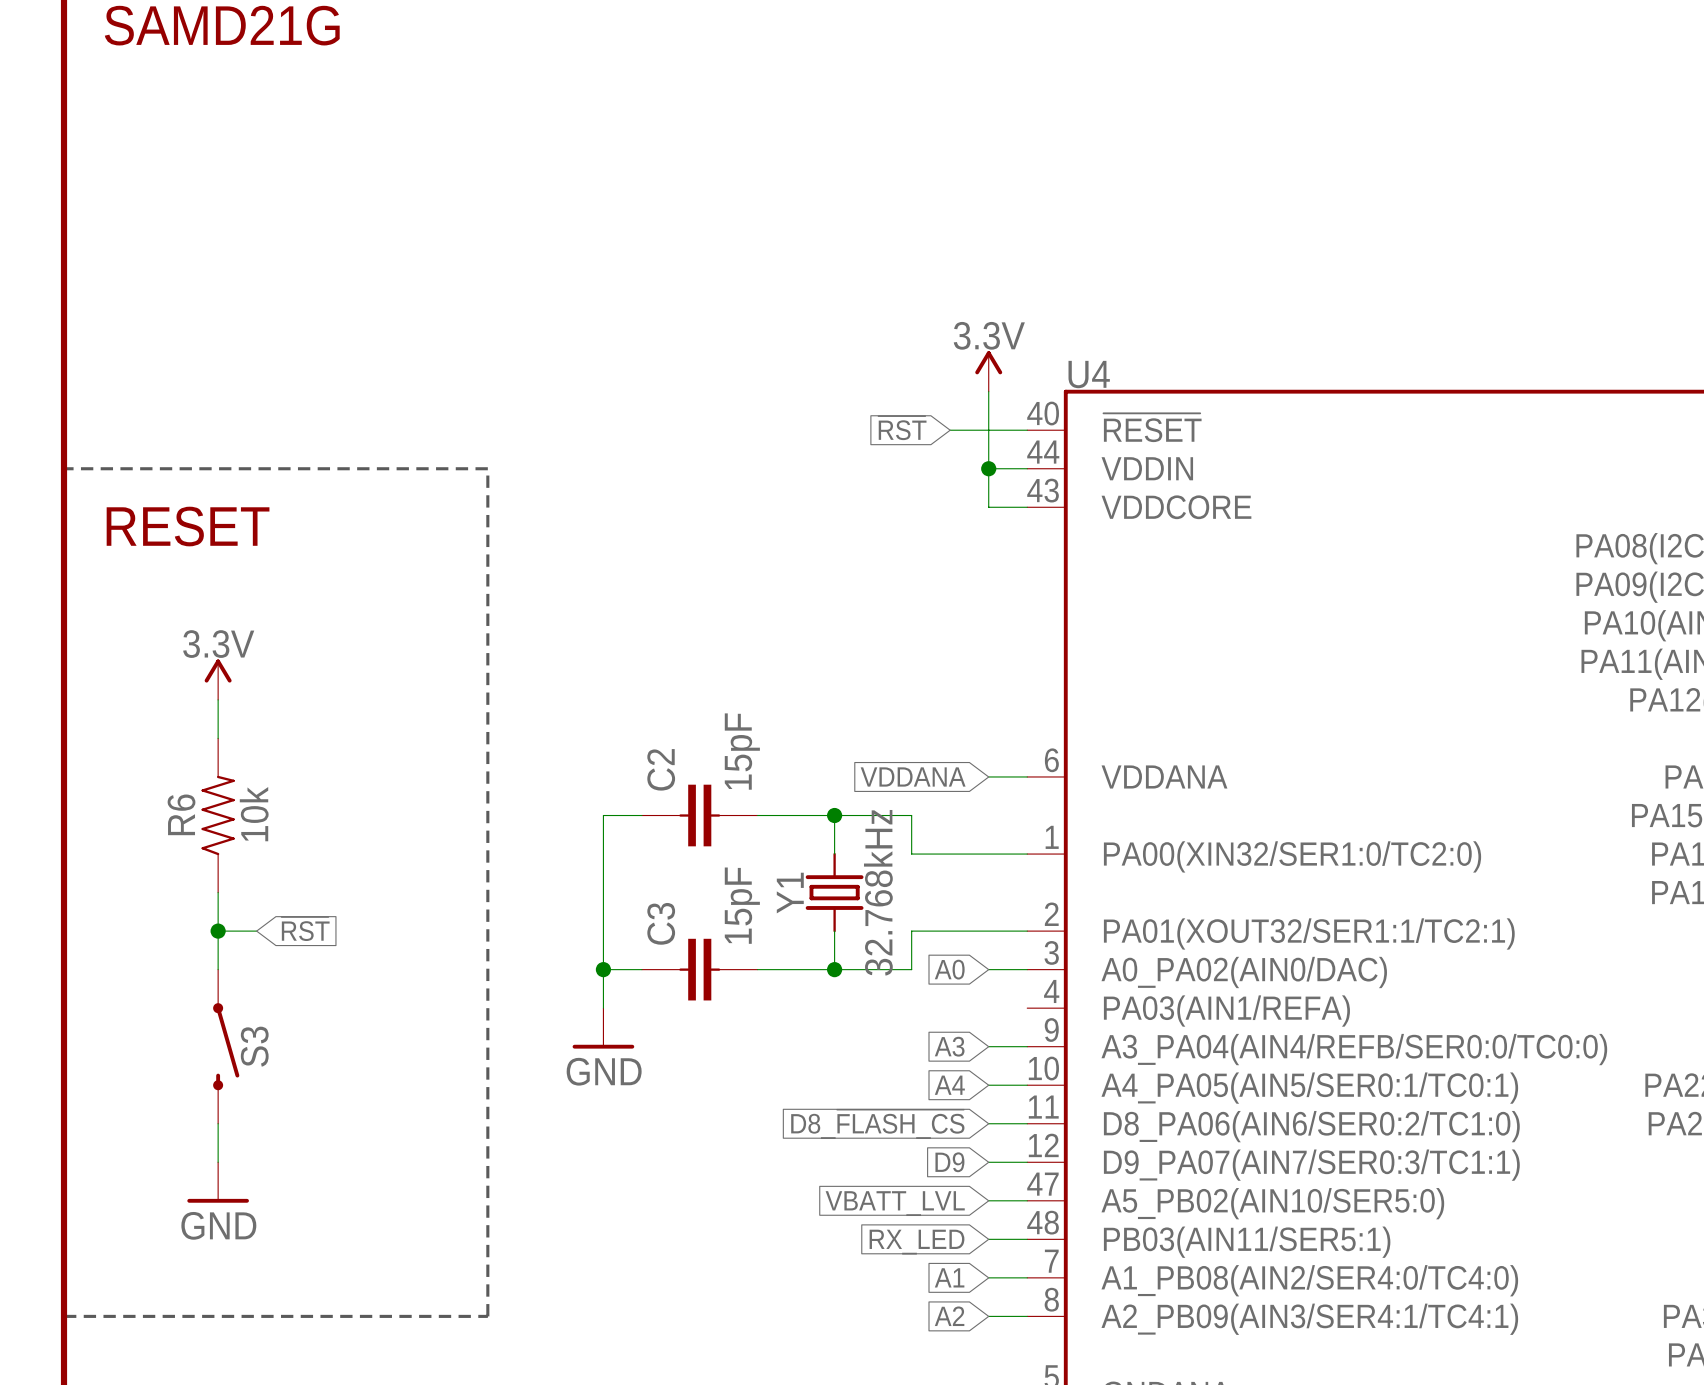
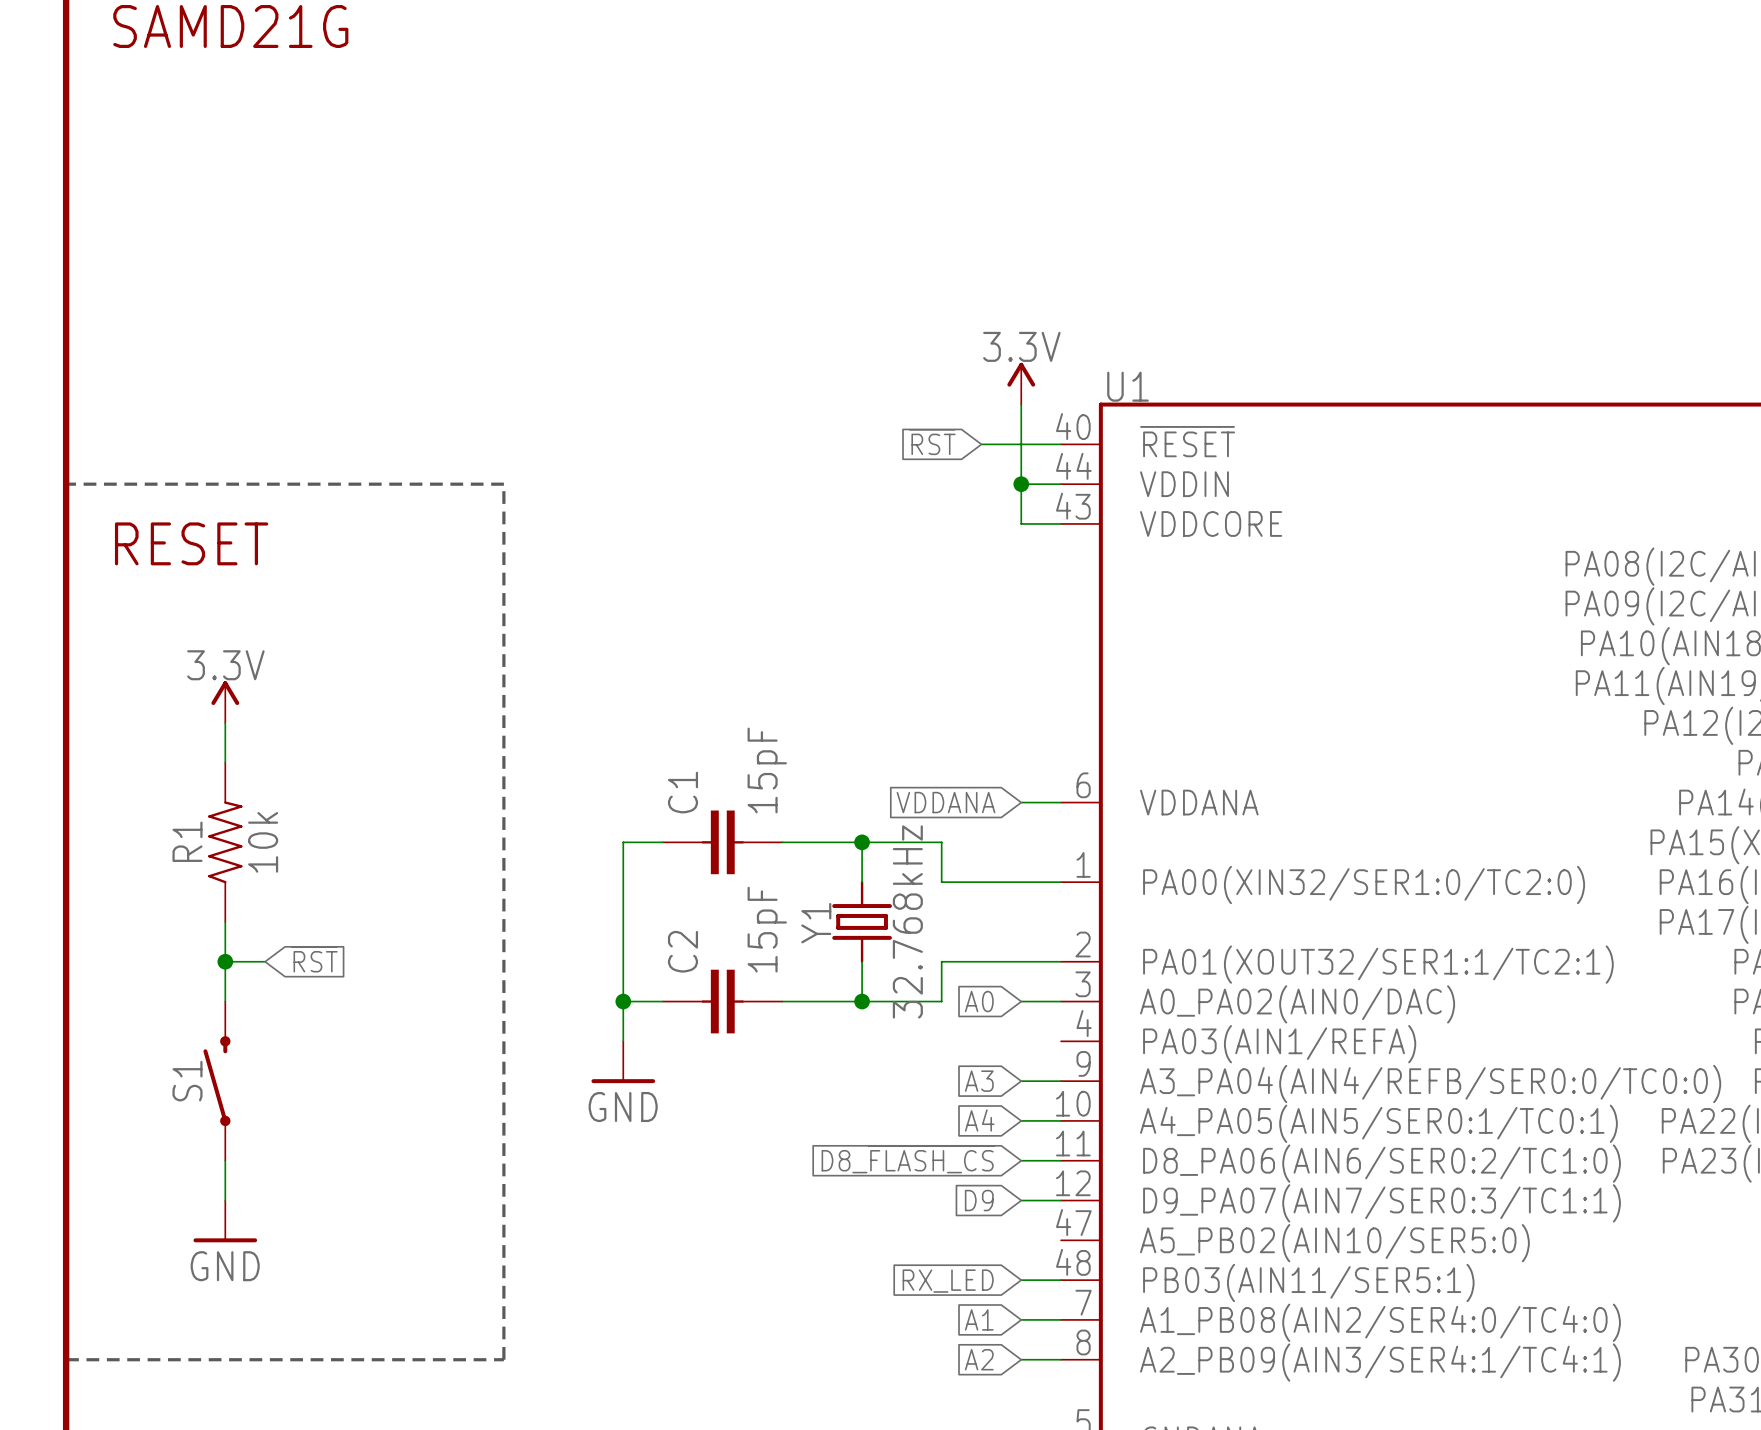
U4 name: U4 (1089, 374) -> U1 (1127, 386)
C2 name: C2 (661, 769) -> C1 (682, 792)
R6 name: R6 (181, 814) -> R1 (187, 841)
C3 name: C3 (661, 923) -> C2 (682, 951)
S1: none -> (216, 1081)
S3: (226, 1046) -> none
wire: (988, 1200) (1027, 1200) -> none
global label: VBATT_LVL (895, 1203) -> none

